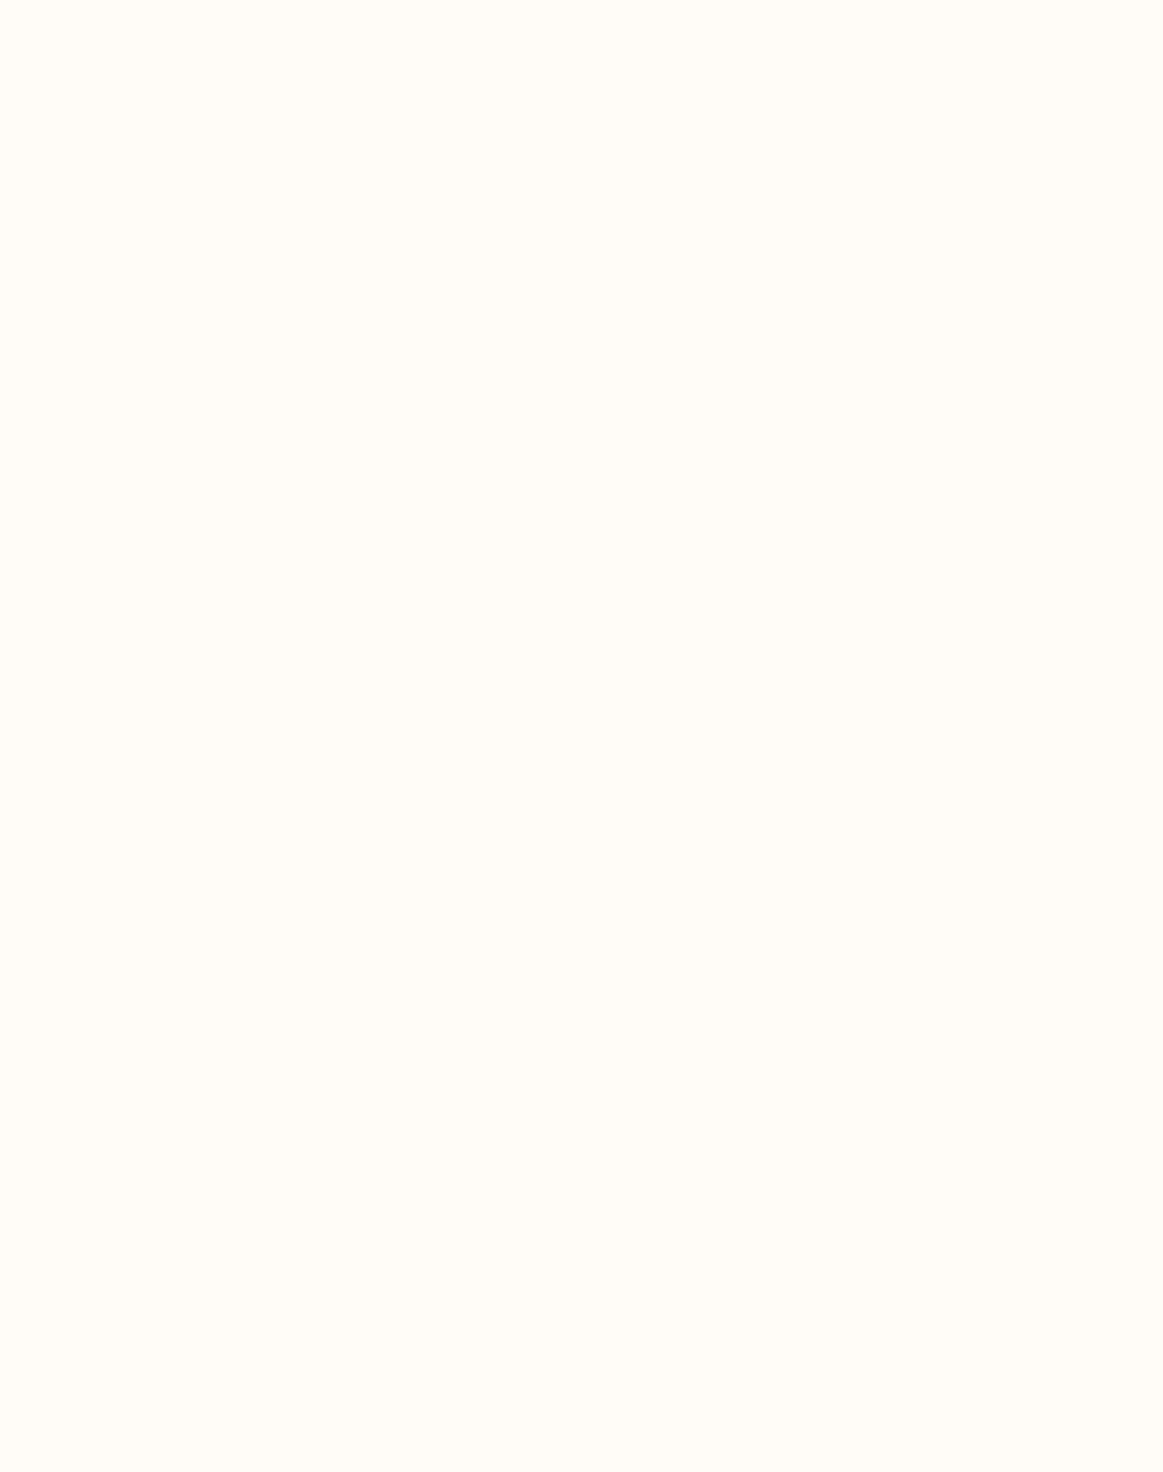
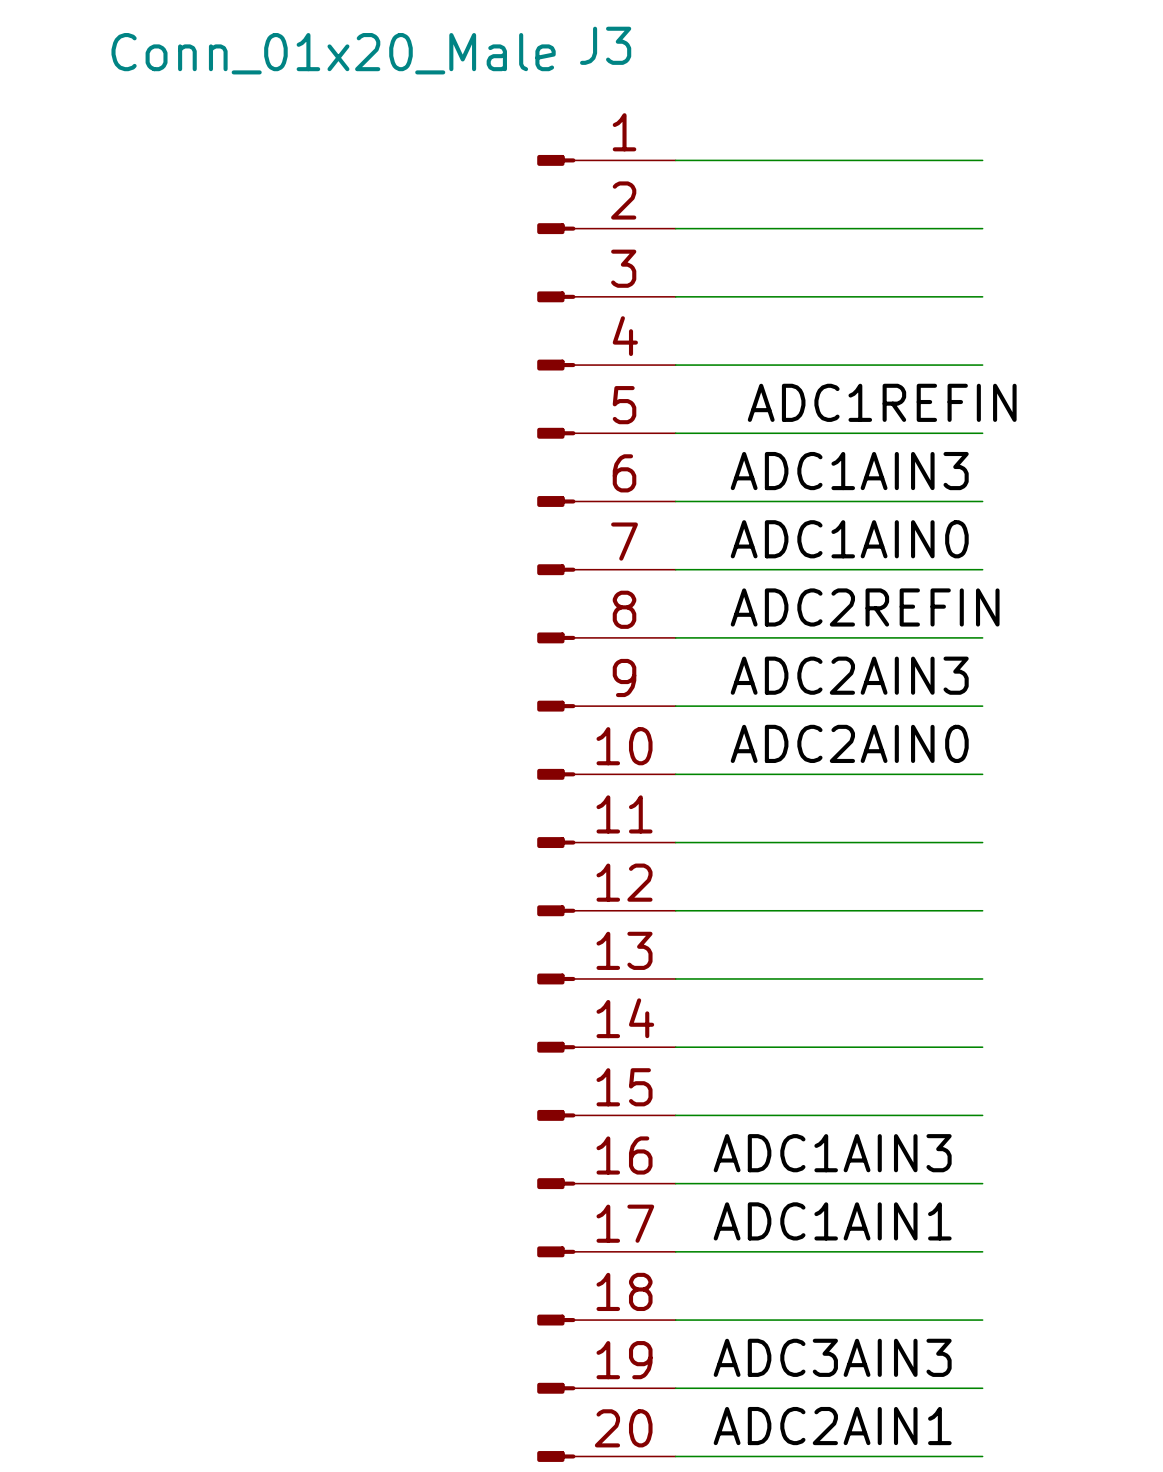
wire: none -> (675, 160) (982, 160)
wire: none -> (675, 228) (982, 228)
wire: none -> (675, 296) (982, 296)
wire: none -> (675, 365) (982, 365)
label: none -> ADC1REFIN (882, 402)
wire: none -> (675, 433) (982, 433)
label: none -> ADC1AIN3 (849, 471)
wire: none -> (675, 501) (982, 501)
label: none -> ADC1AIN0 (849, 539)
wire: none -> (675, 569) (982, 569)
label: none -> ADC2REFIN (865, 607)
wire: none -> (675, 637) (982, 637)
label: none -> ADC2AIN3 (849, 675)
wire: none -> (675, 706) (982, 706)
label: none -> ADC2AIN0 (849, 743)
wire: none -> (675, 774) (982, 774)
J3: none -> Conn_01x20_Male (606, 808)
wire: none -> (675, 842) (982, 842)
wire: none -> (675, 910) (982, 910)
wire: none -> (675, 978) (982, 978)
wire: none -> (675, 1047) (982, 1047)
wire: none -> (675, 1115) (982, 1115)
label: none -> ADC1AIN3 (832, 1153)
wire: none -> (675, 1183) (982, 1183)
label: none -> ADC1AIN1 (832, 1221)
wire: none -> (675, 1251) (982, 1251)
wire: none -> (675, 1320) (982, 1320)
label: none -> ADC3AIN3 (832, 1357)
wire: none -> (675, 1388) (982, 1388)
label: none -> ADC2AIN1 (832, 1426)
wire: none -> (675, 1456) (982, 1456)

